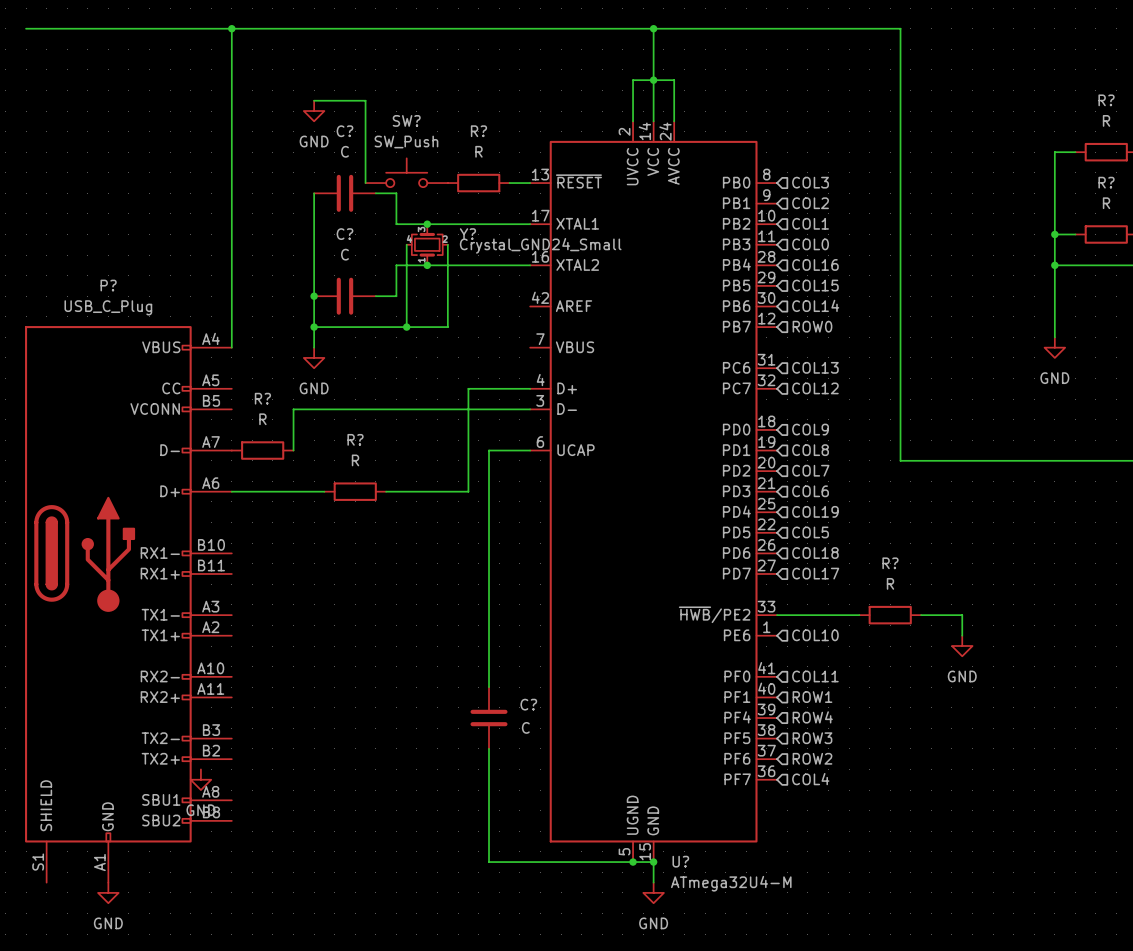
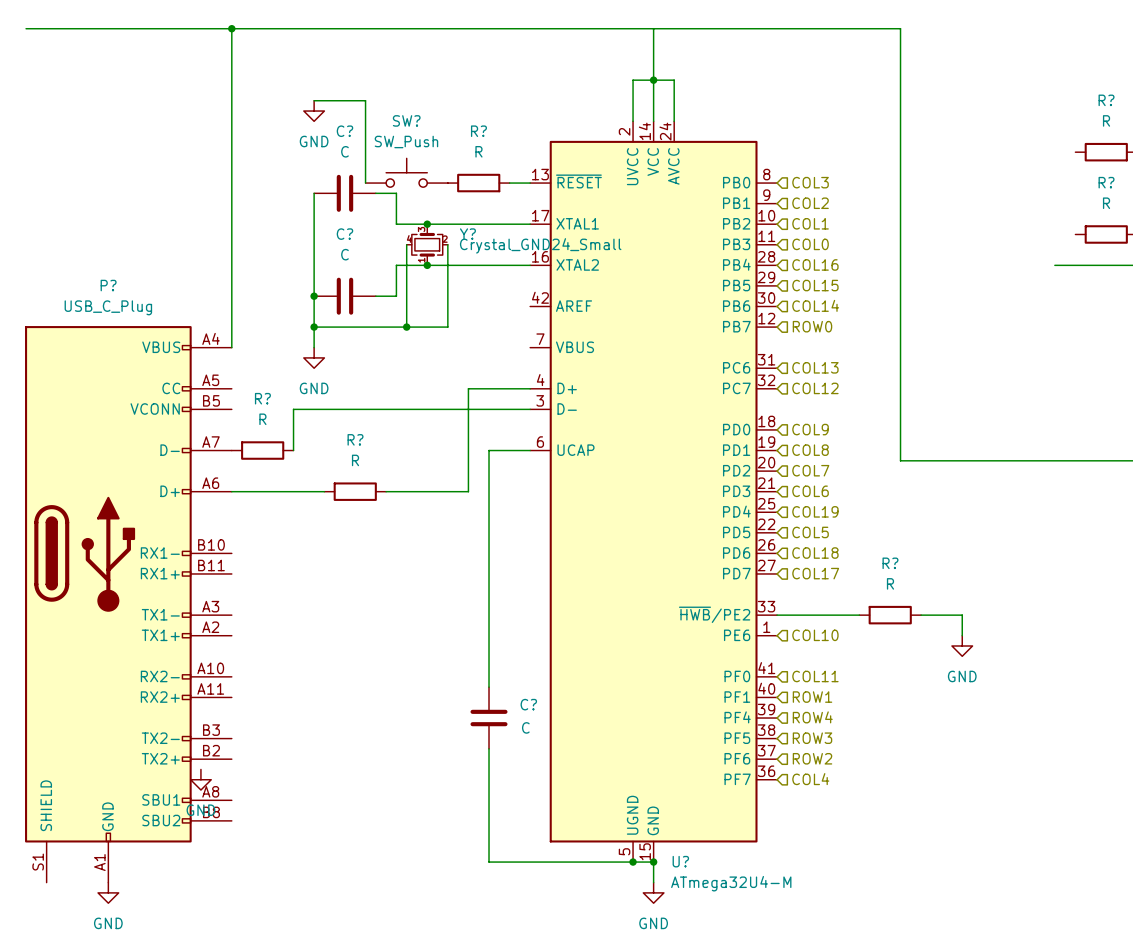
junction: (653, 28) -> none
wire: (1075, 152) (1054, 152) (1054, 337) -> none
wire: (1054, 234) (1075, 234) -> none
junction: (1054, 234) -> none
junction: (1054, 265) -> none
power symbol: GND (1054, 347) -> none

